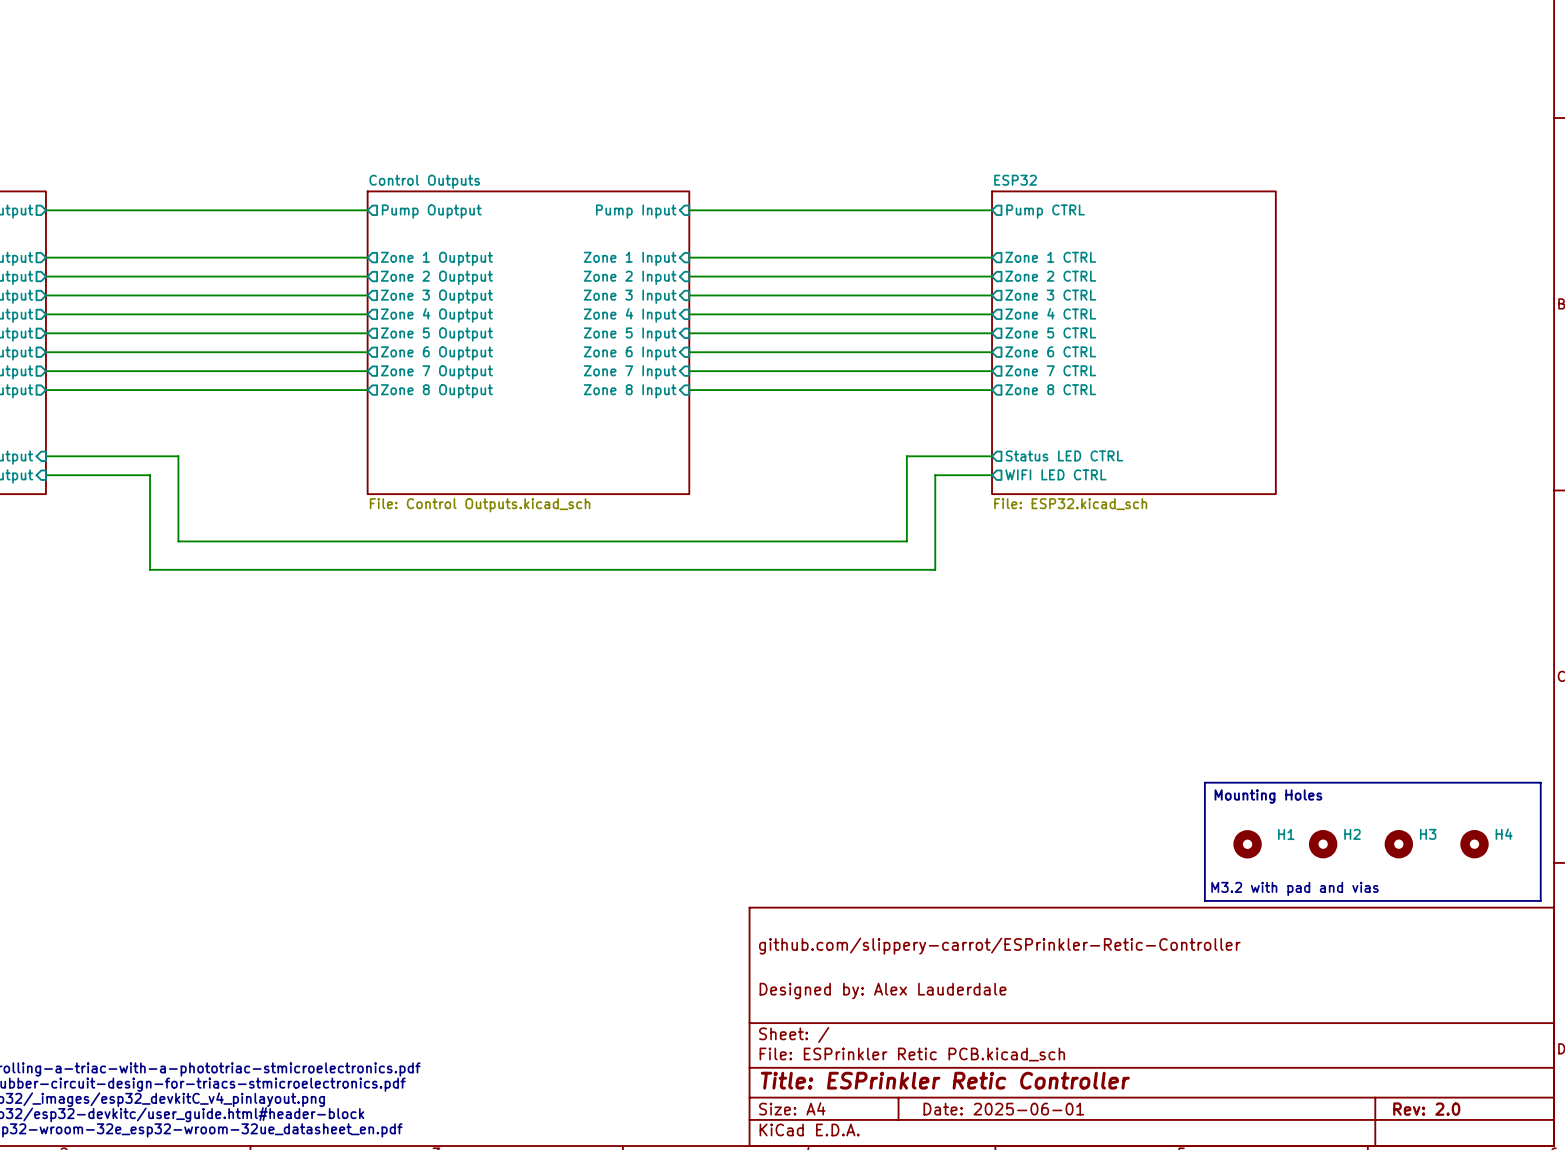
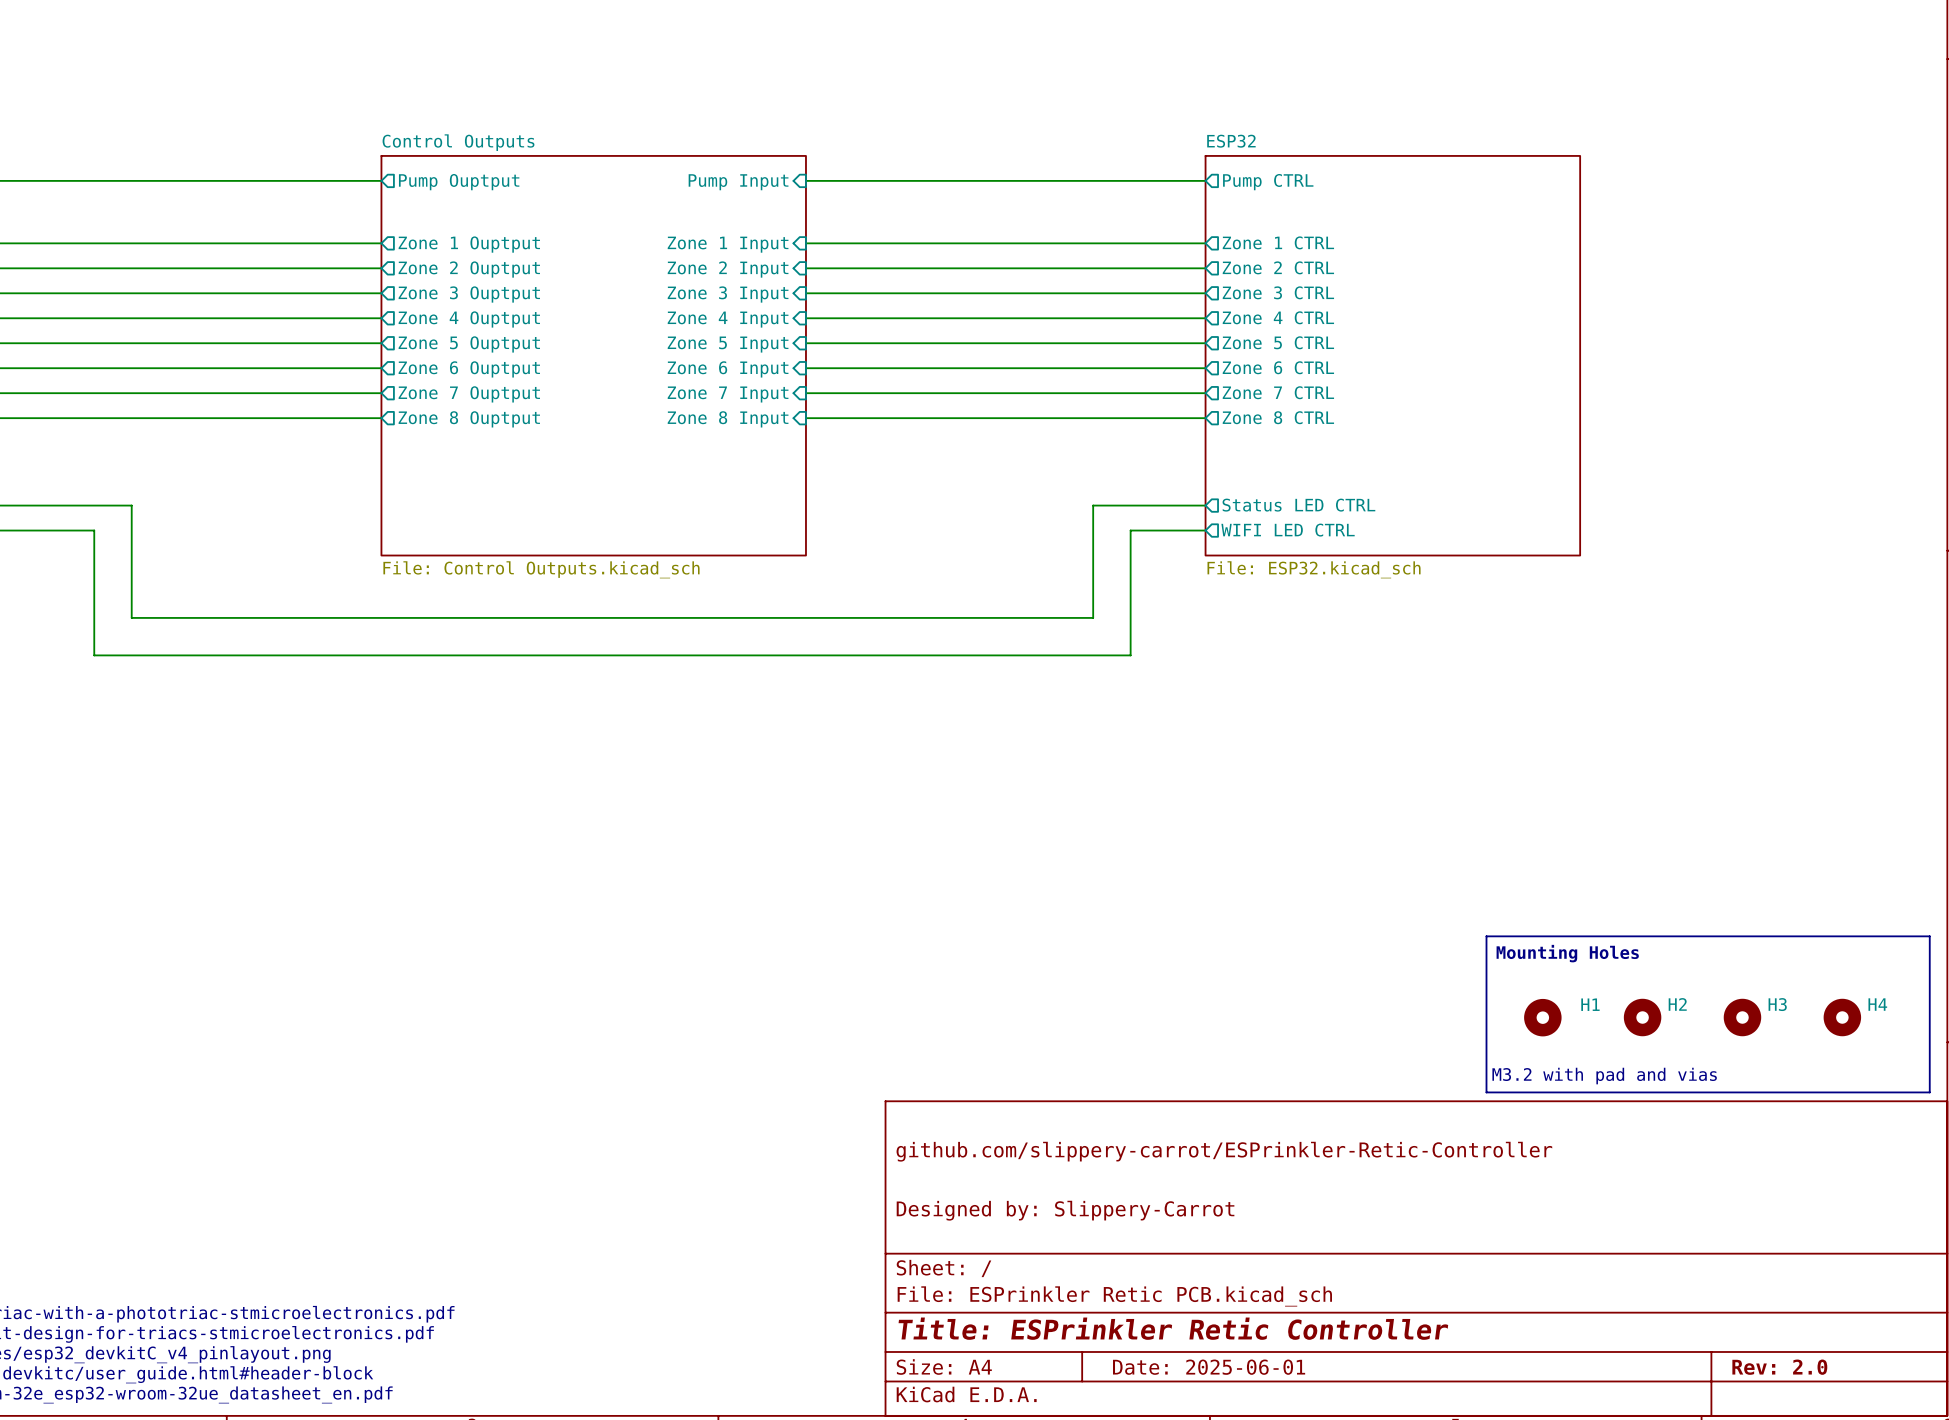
title block: Designed by: Alex Lauderdale (883, 991) -> Designed by: Slippery-Carrot (1065, 1210)

